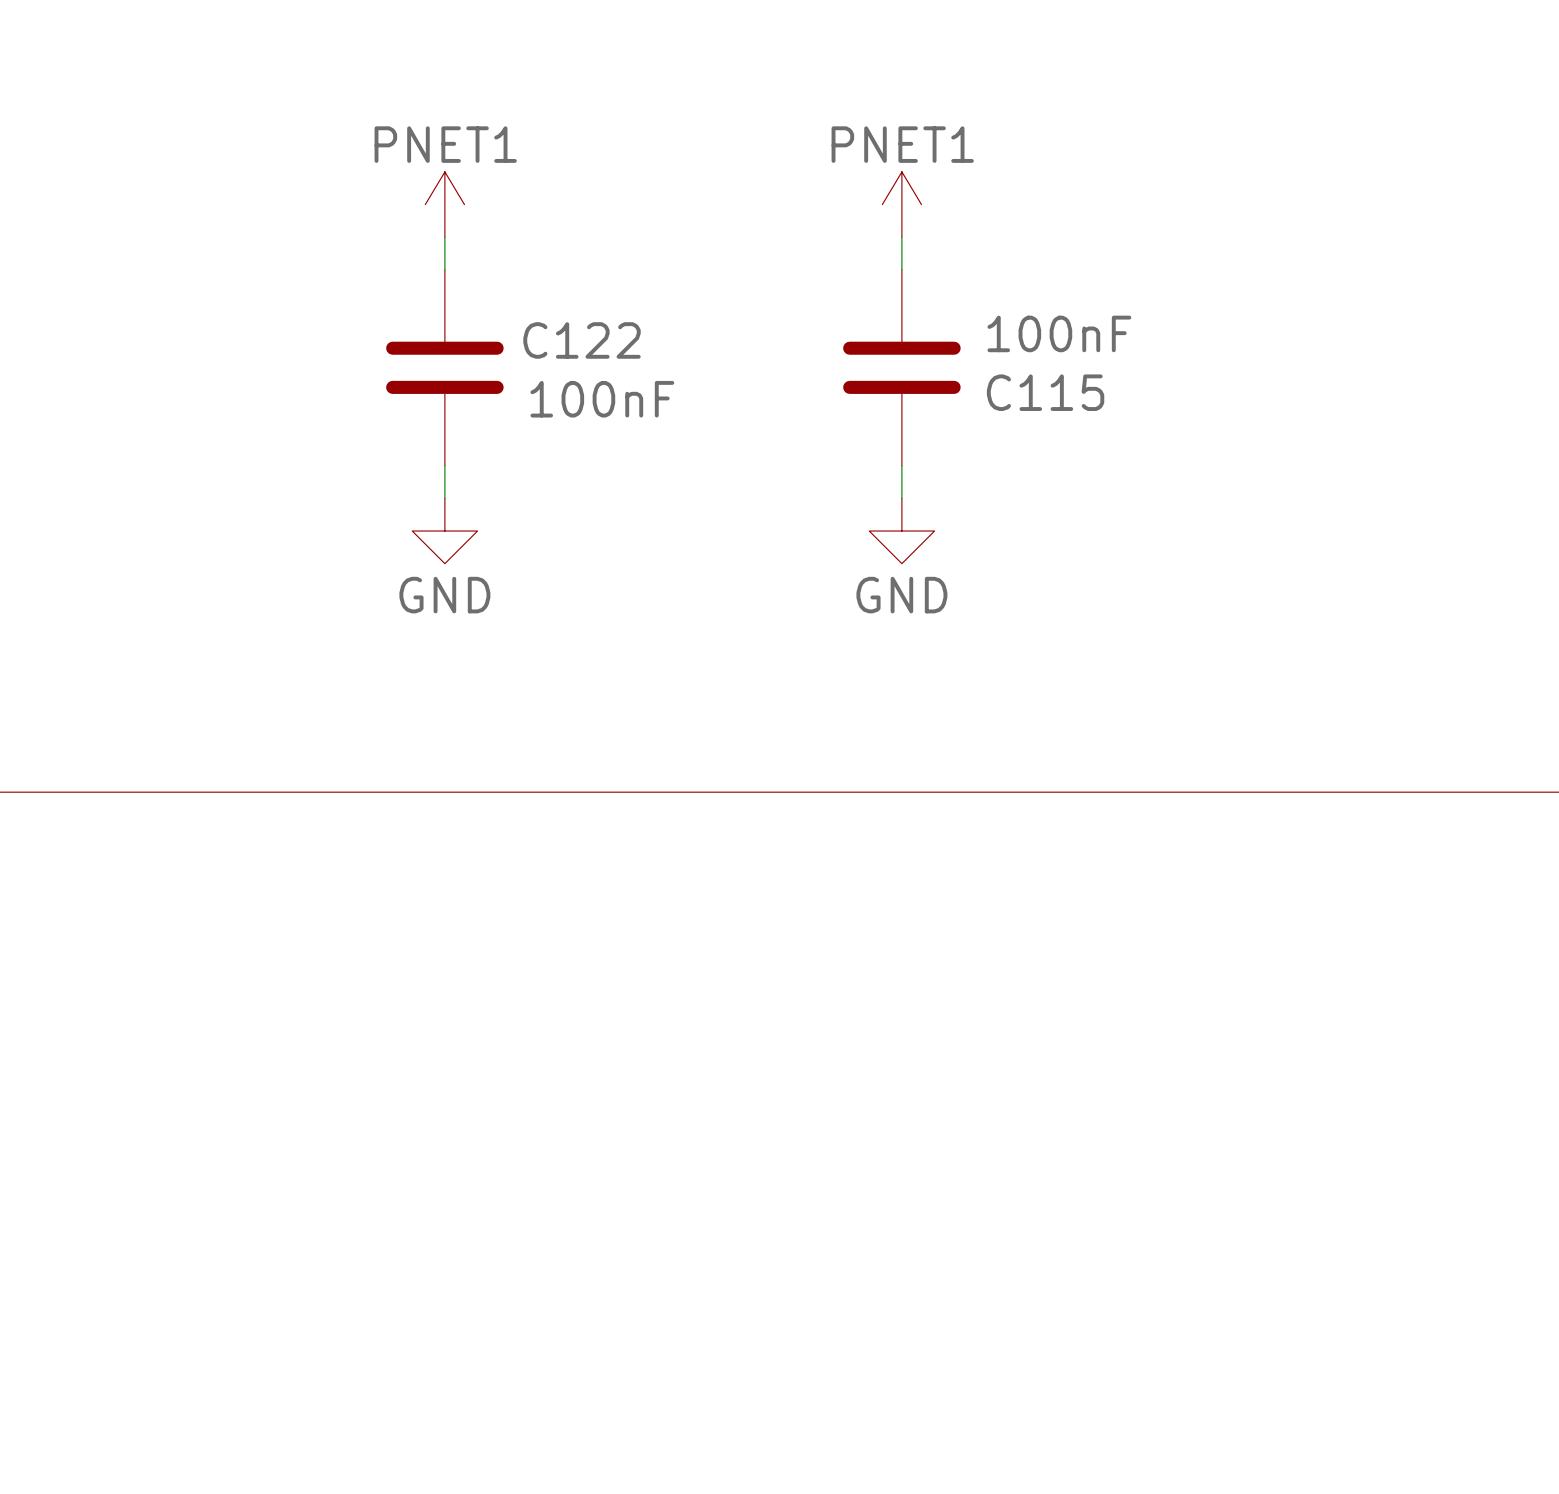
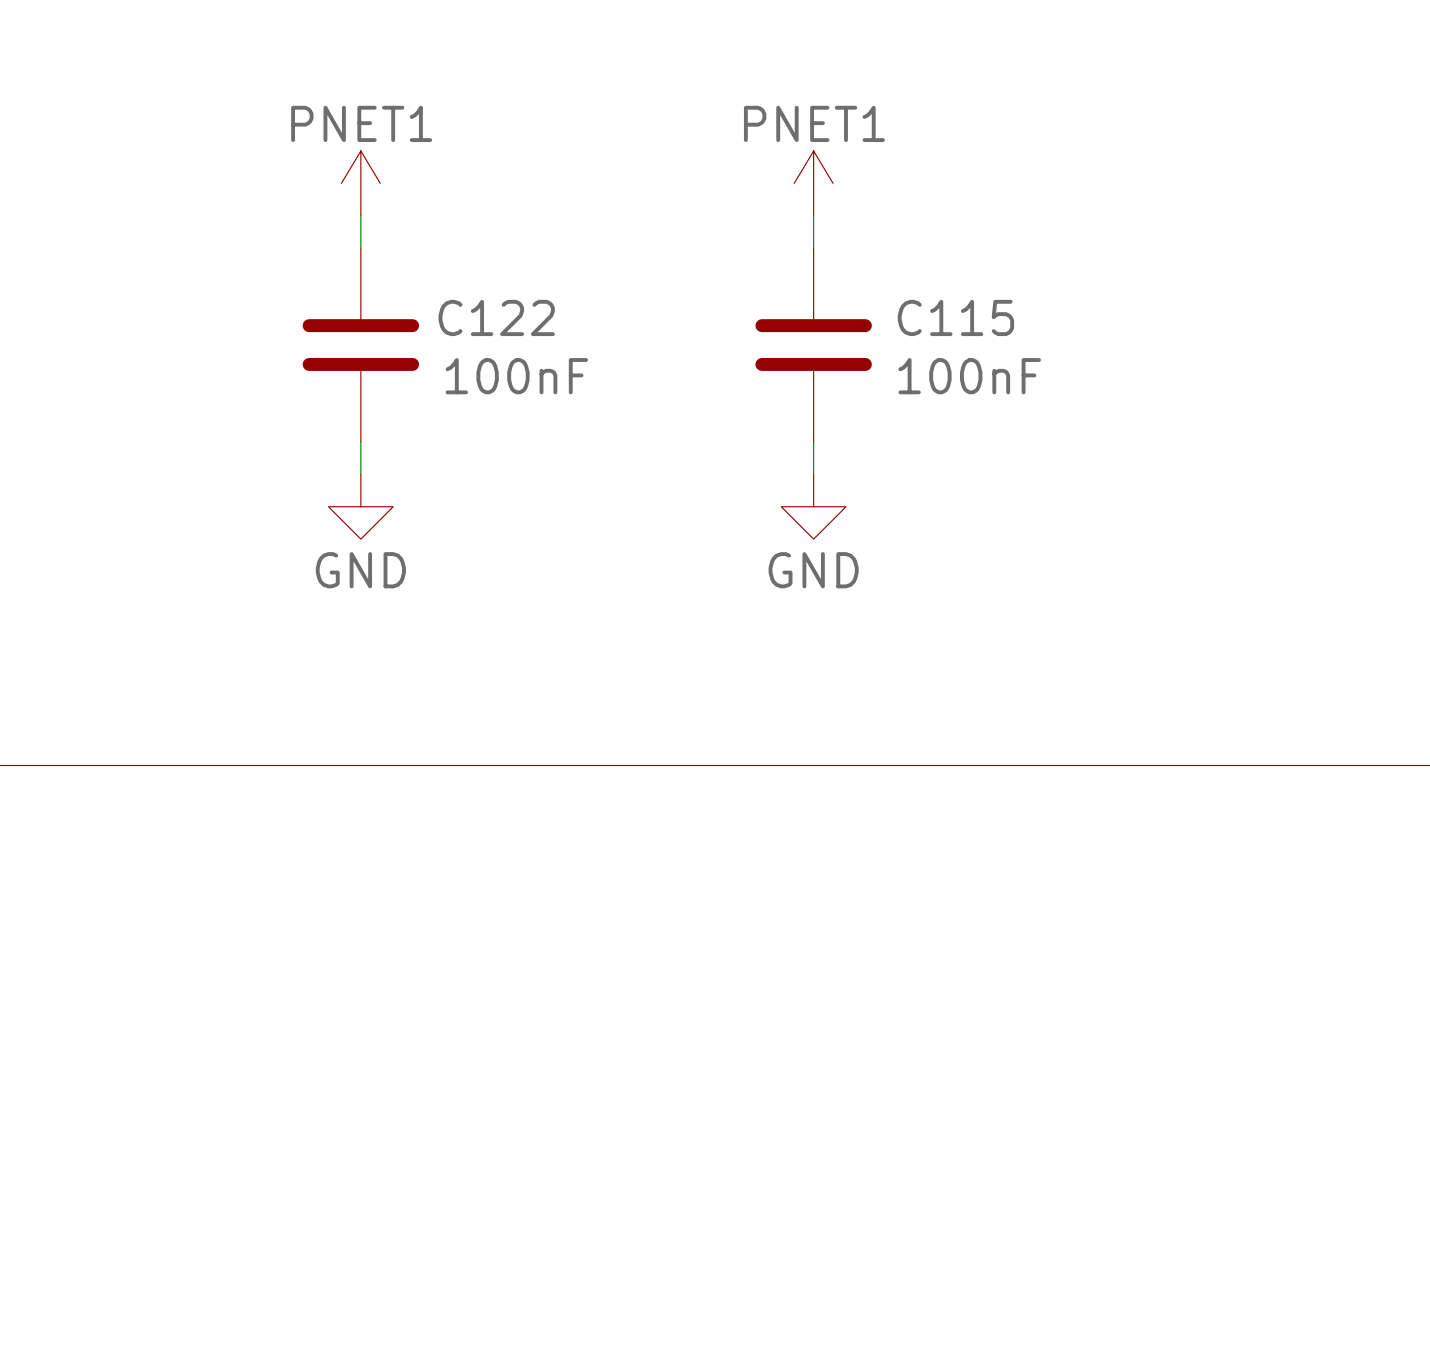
C115 value position: 100nF (1059, 333) -> 100nF (969, 376)
C115 name position: C115 (1045, 392) -> C115 (955, 317)

